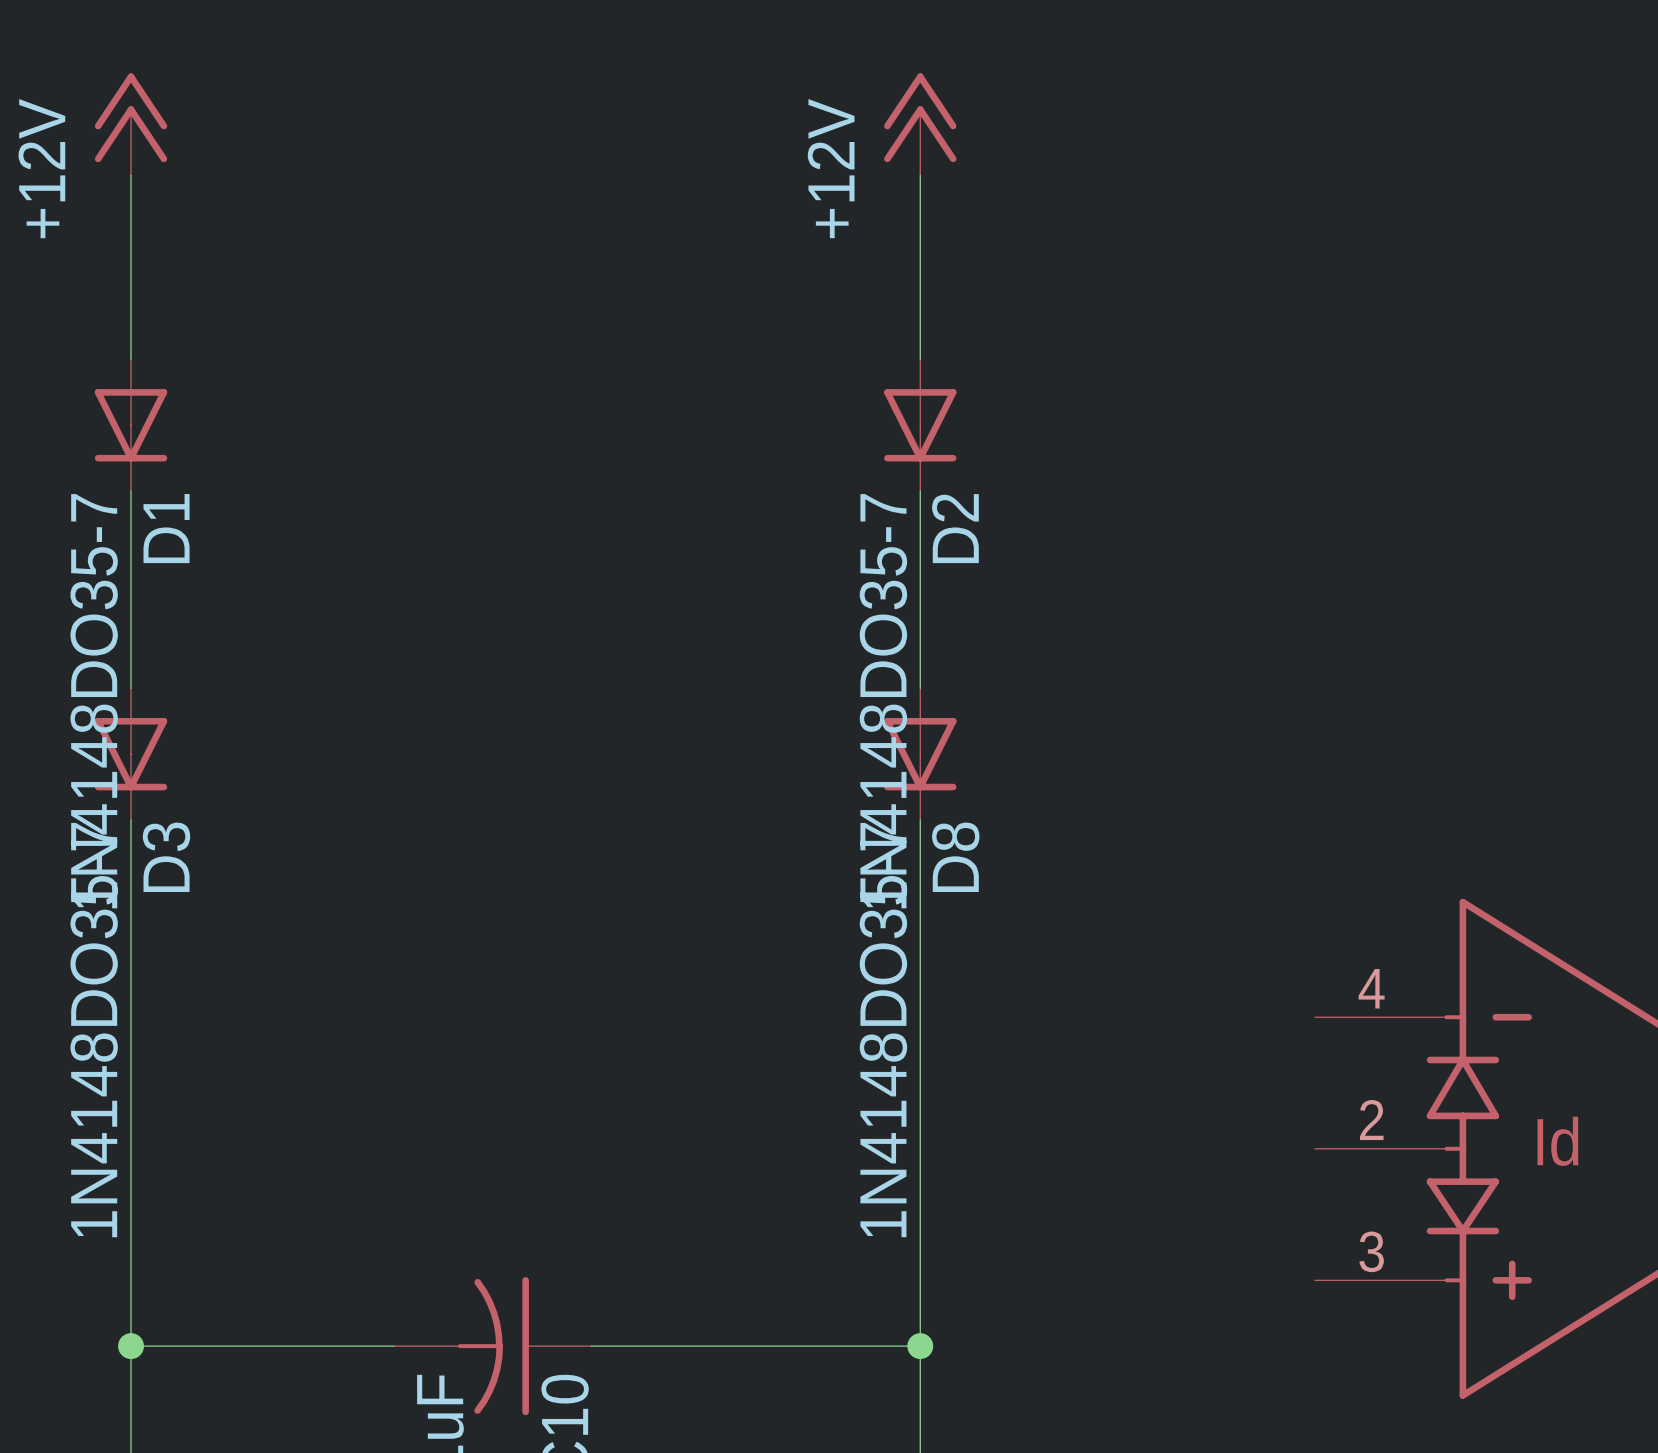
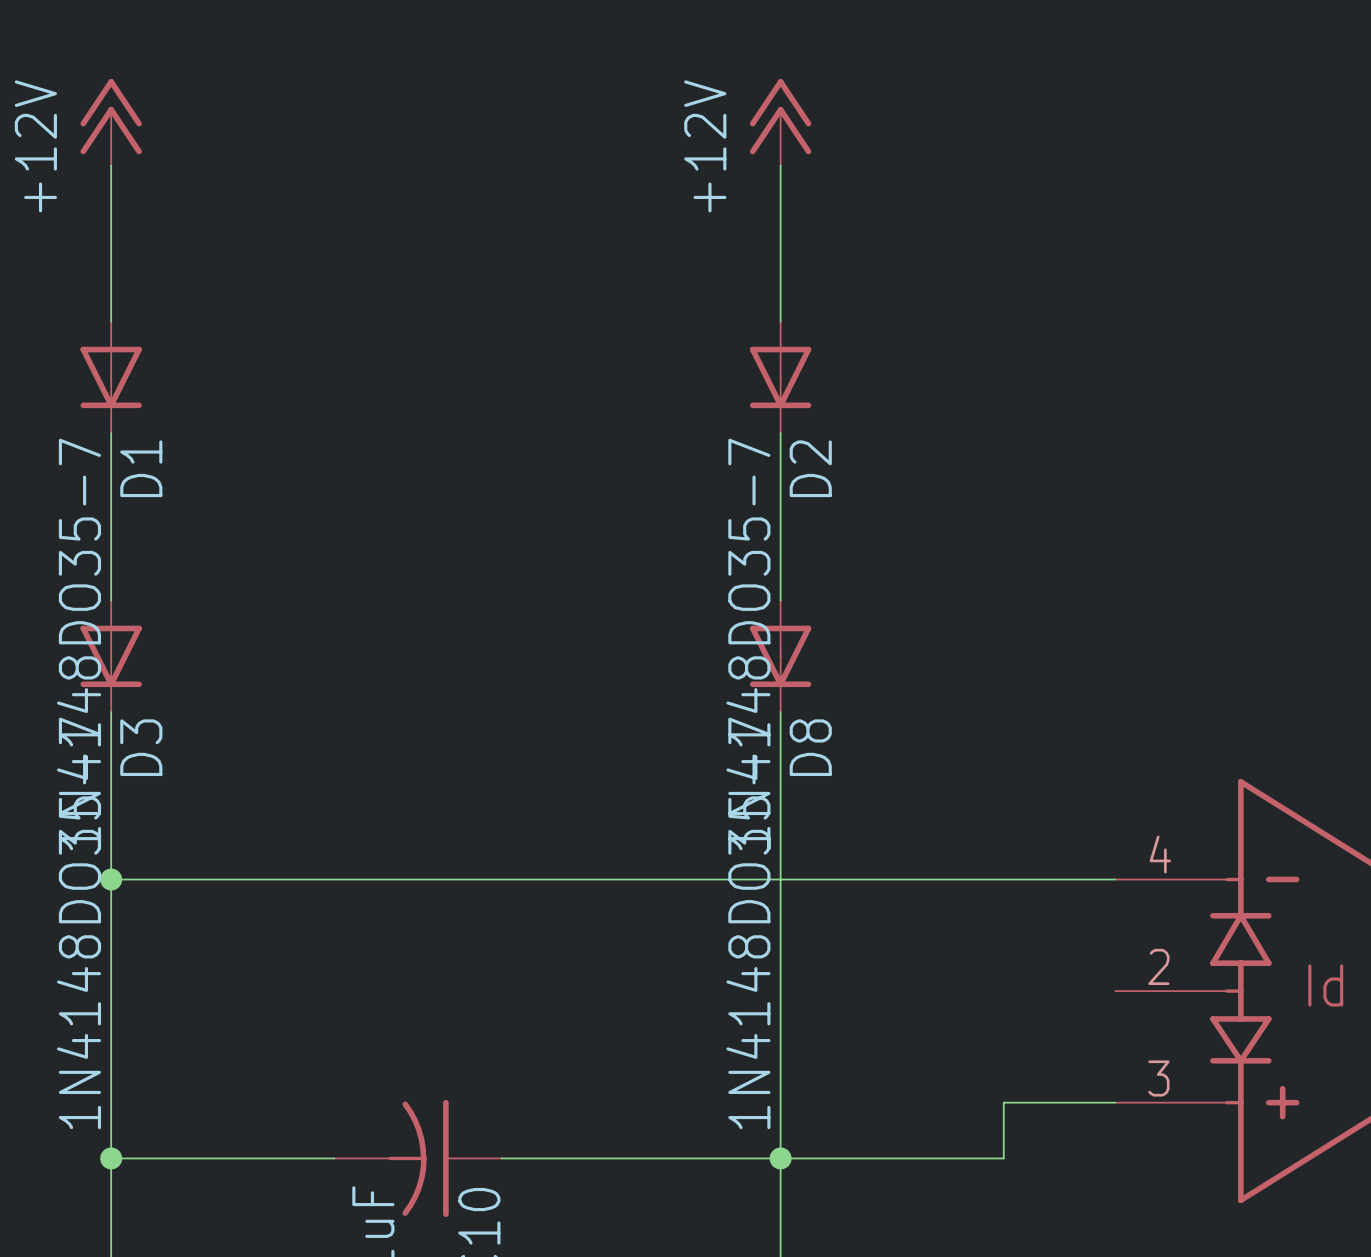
wire: none -> (111, 879) (1115, 879)
junction: none -> (111, 879)
wire: none -> (1115, 1102) (1003, 1102) (1003, 1158) (780, 1158)

